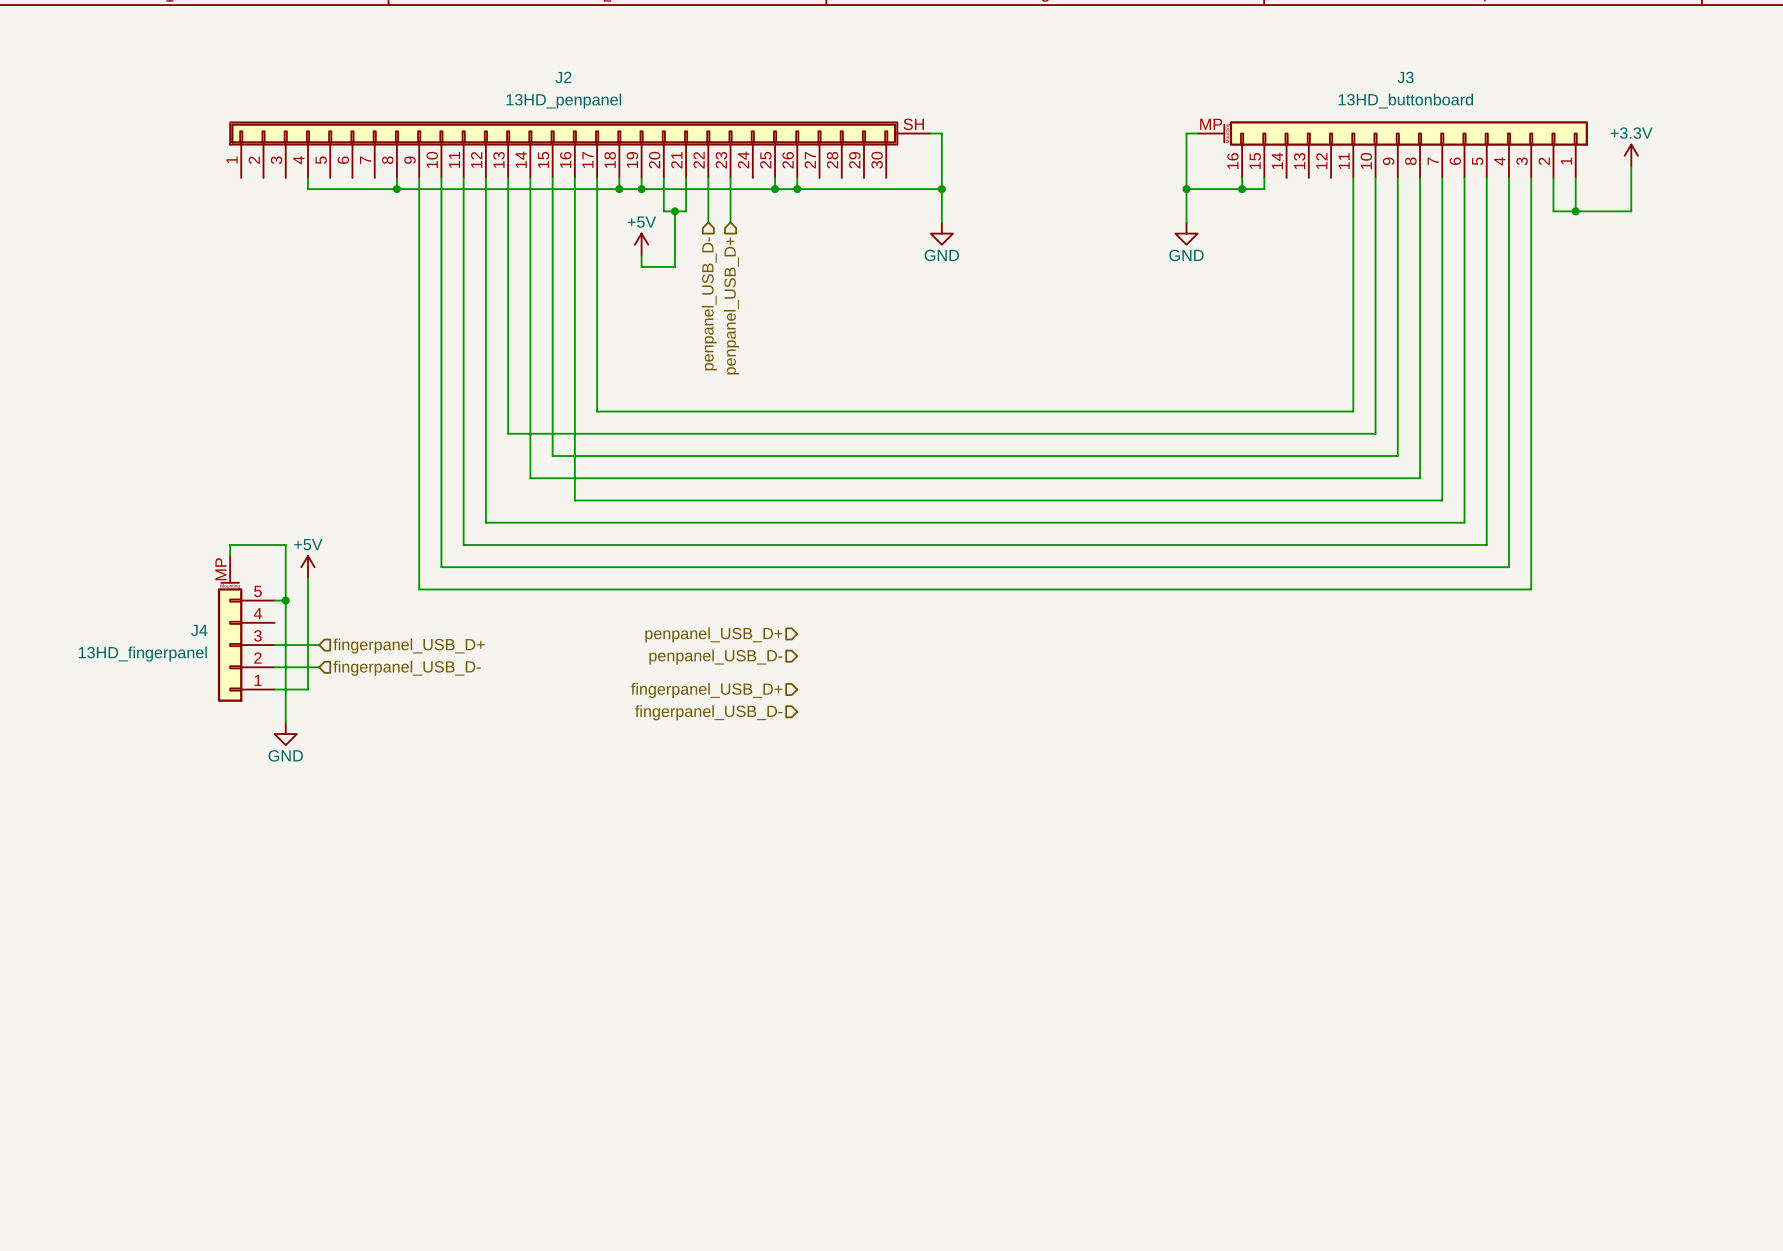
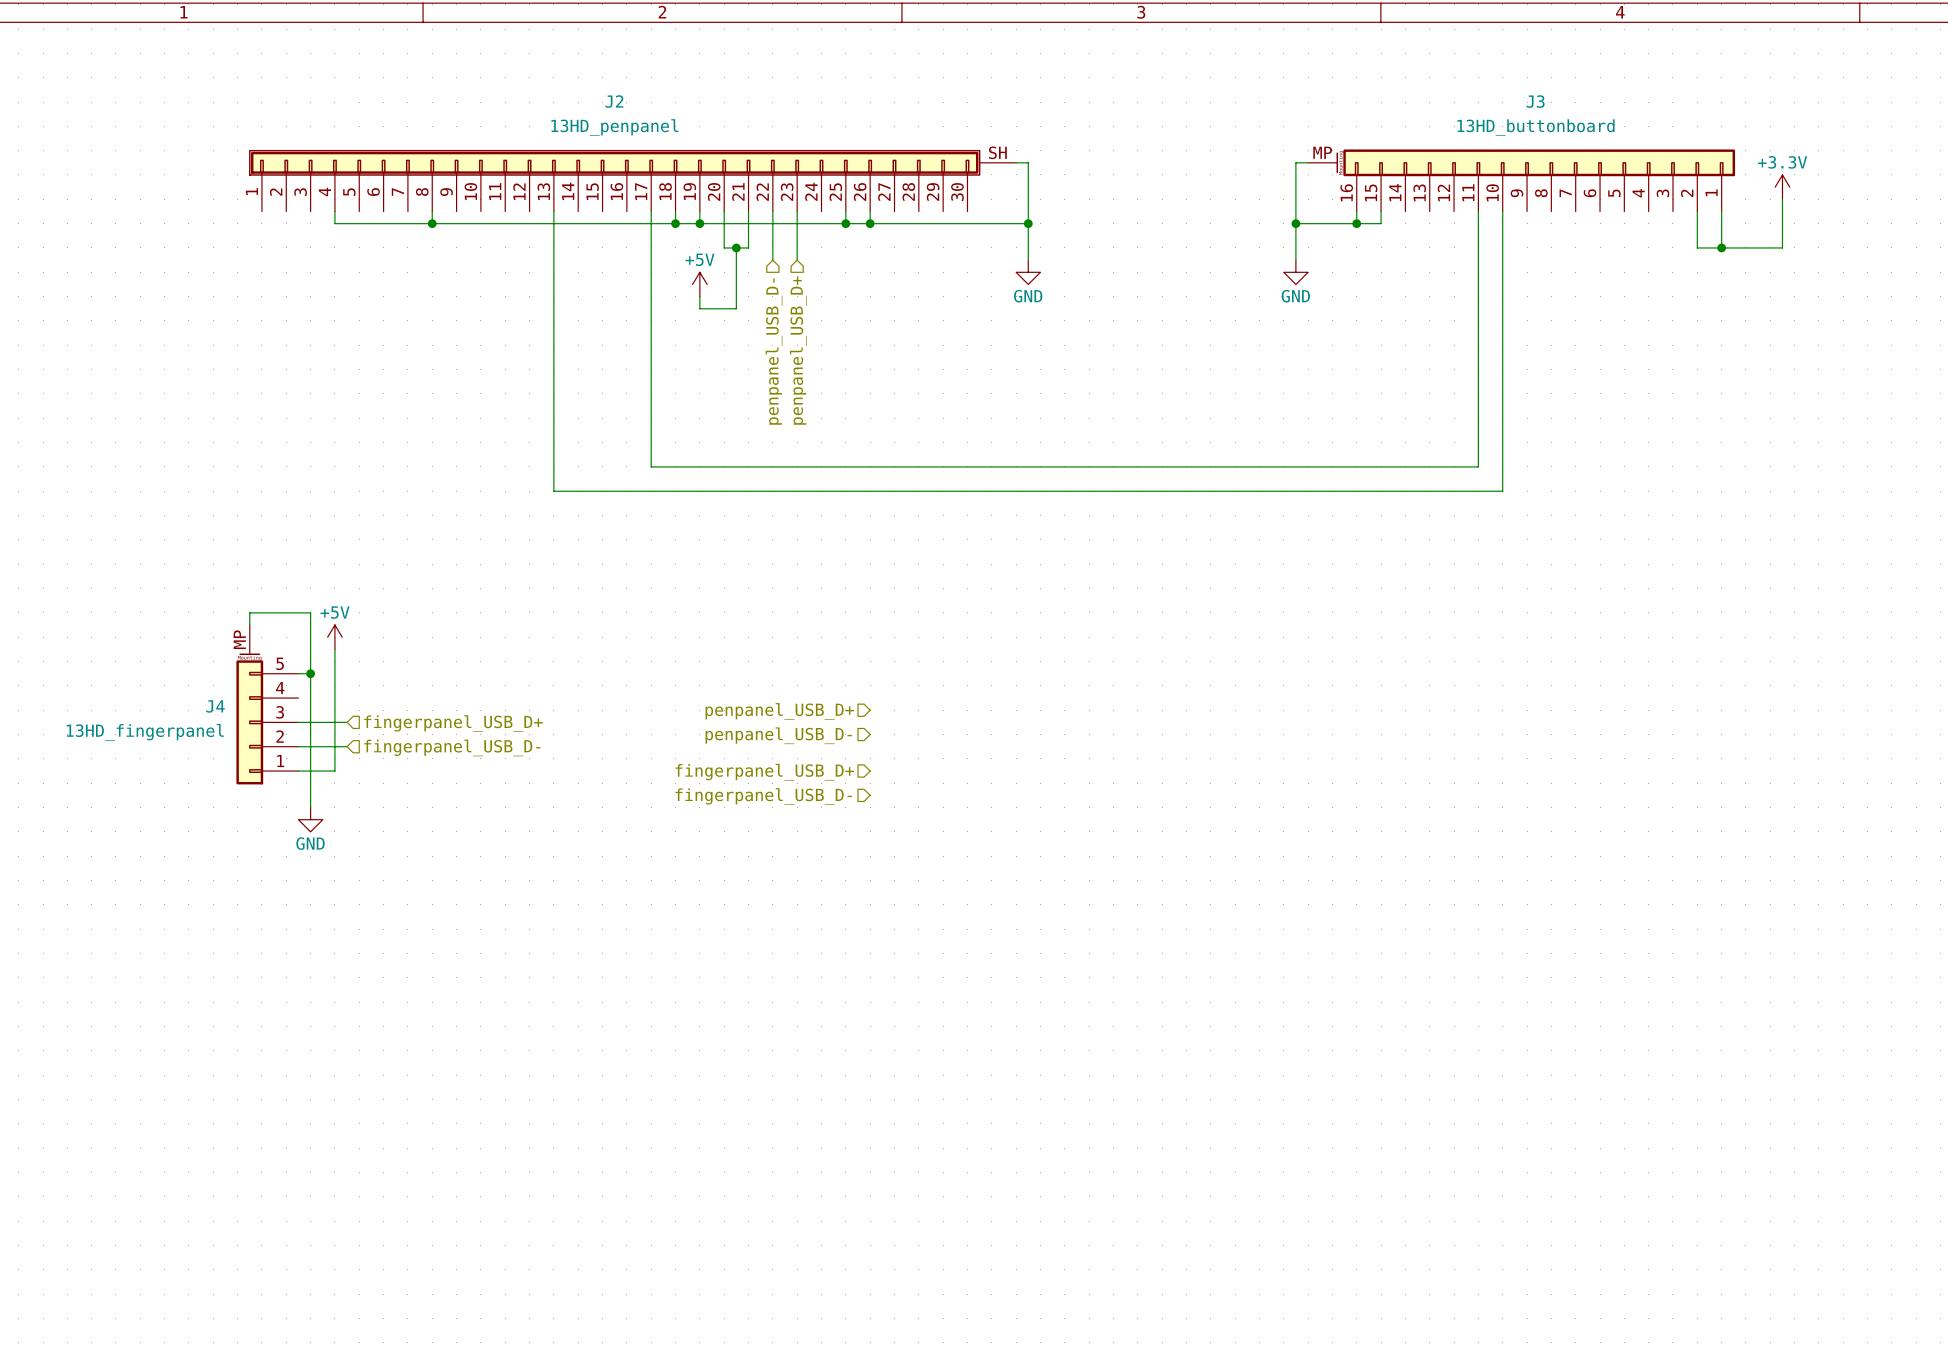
wire: (419, 177) (419, 589) (1531, 589) (1531, 177) -> none
wire: (441, 177) (441, 567) (1508, 567) (1508, 177) -> none
wire: (463, 177) (463, 544) (1486, 544) (1486, 177) -> none
wire: (485, 177) (485, 522) (1464, 522) (1464, 177) -> none
wire: (530, 177) (530, 478) (1420, 478) (1420, 177) -> none
wire: (552, 177) (552, 456) (1397, 456) (1397, 177) -> none
wire: (574, 177) (574, 500) (1442, 500) (1442, 177) -> none

